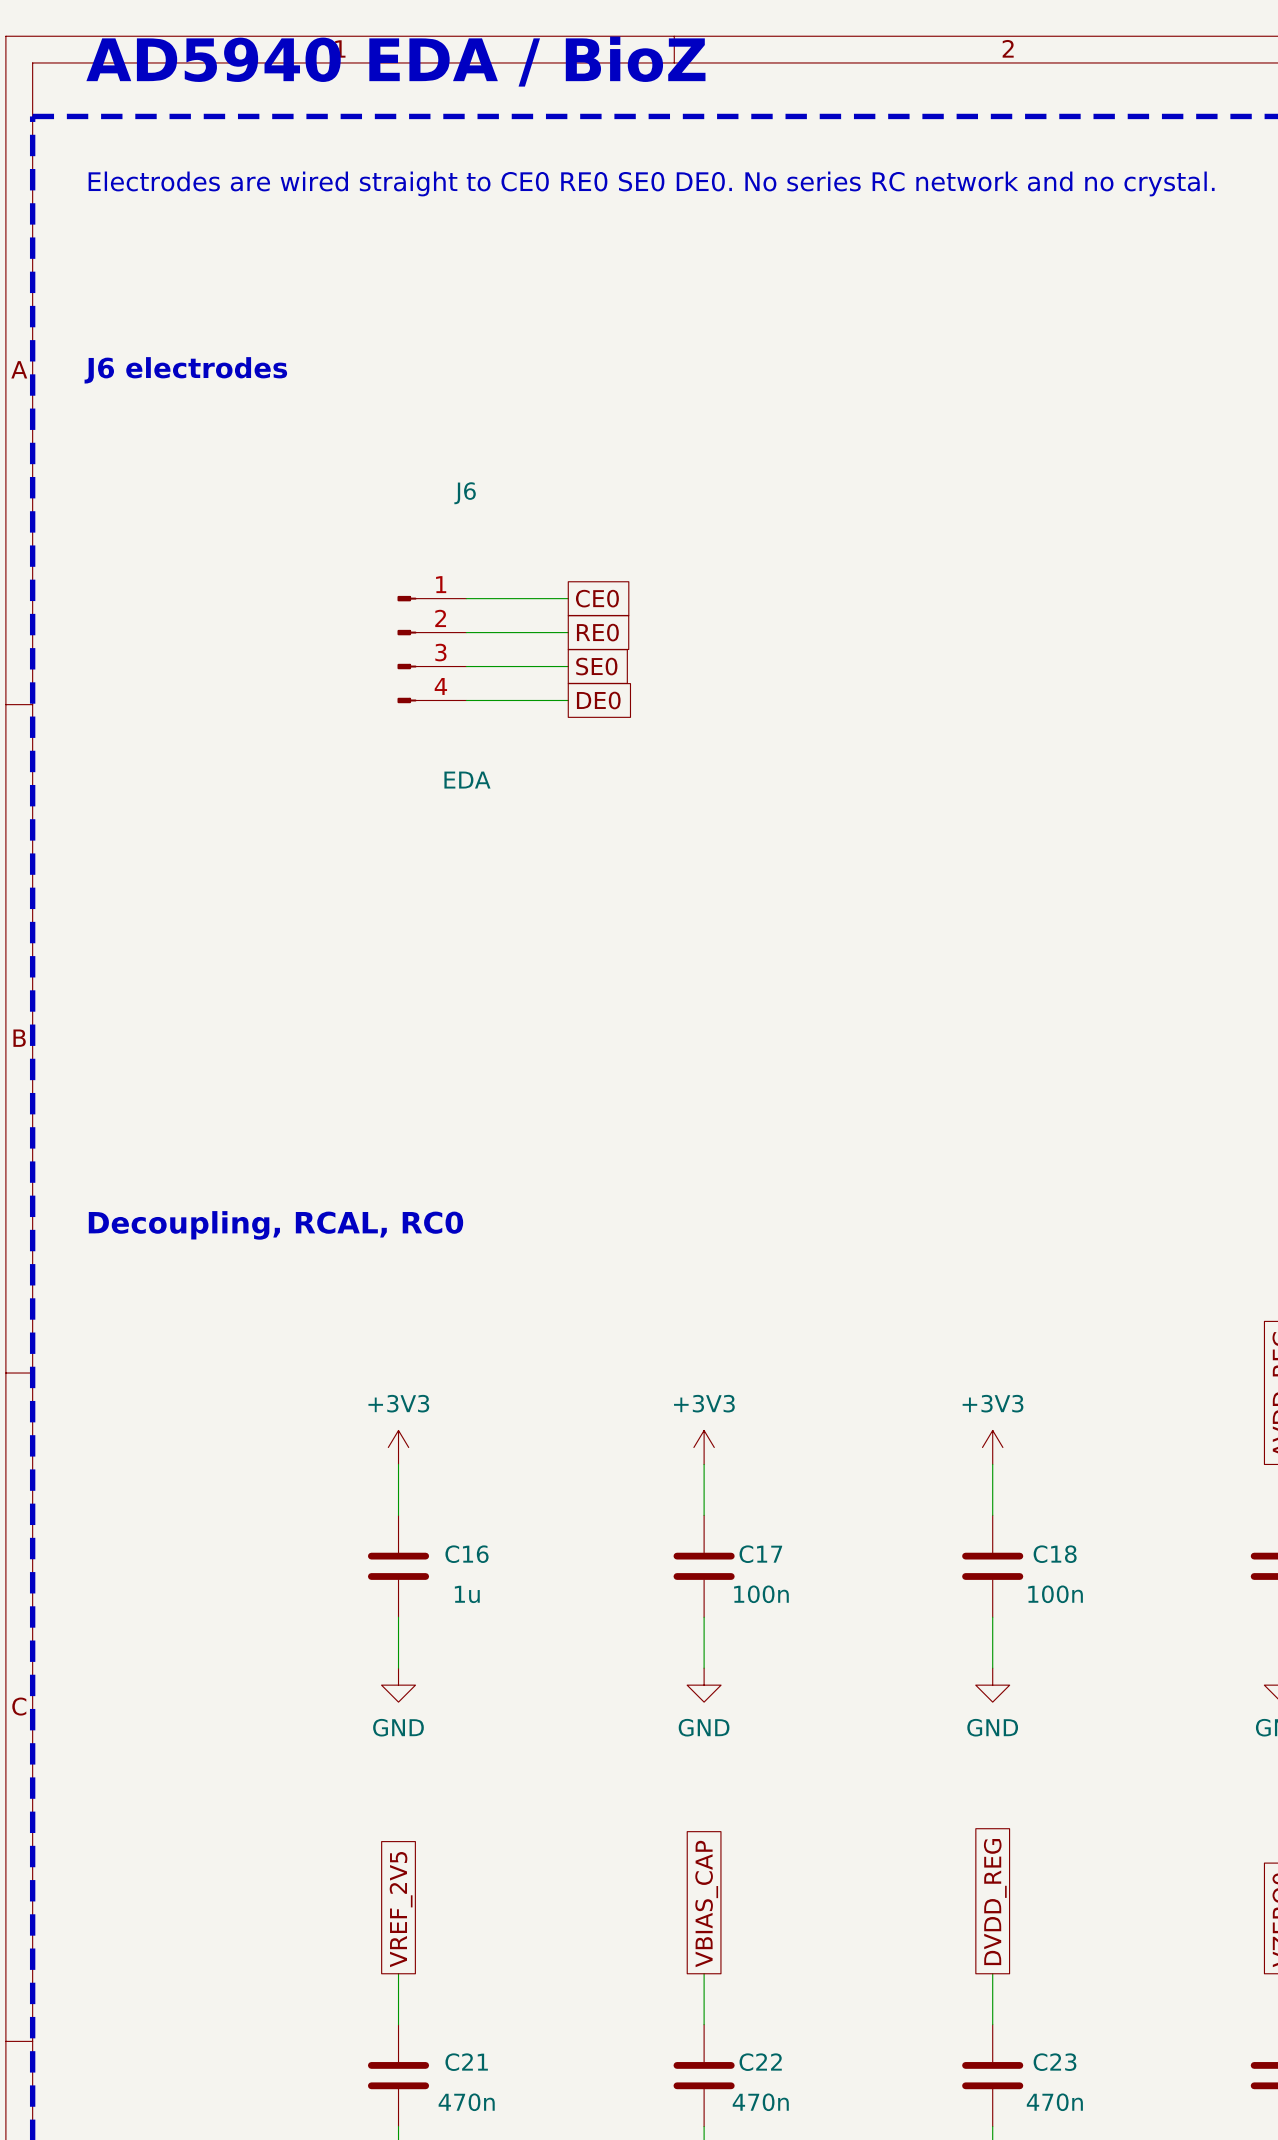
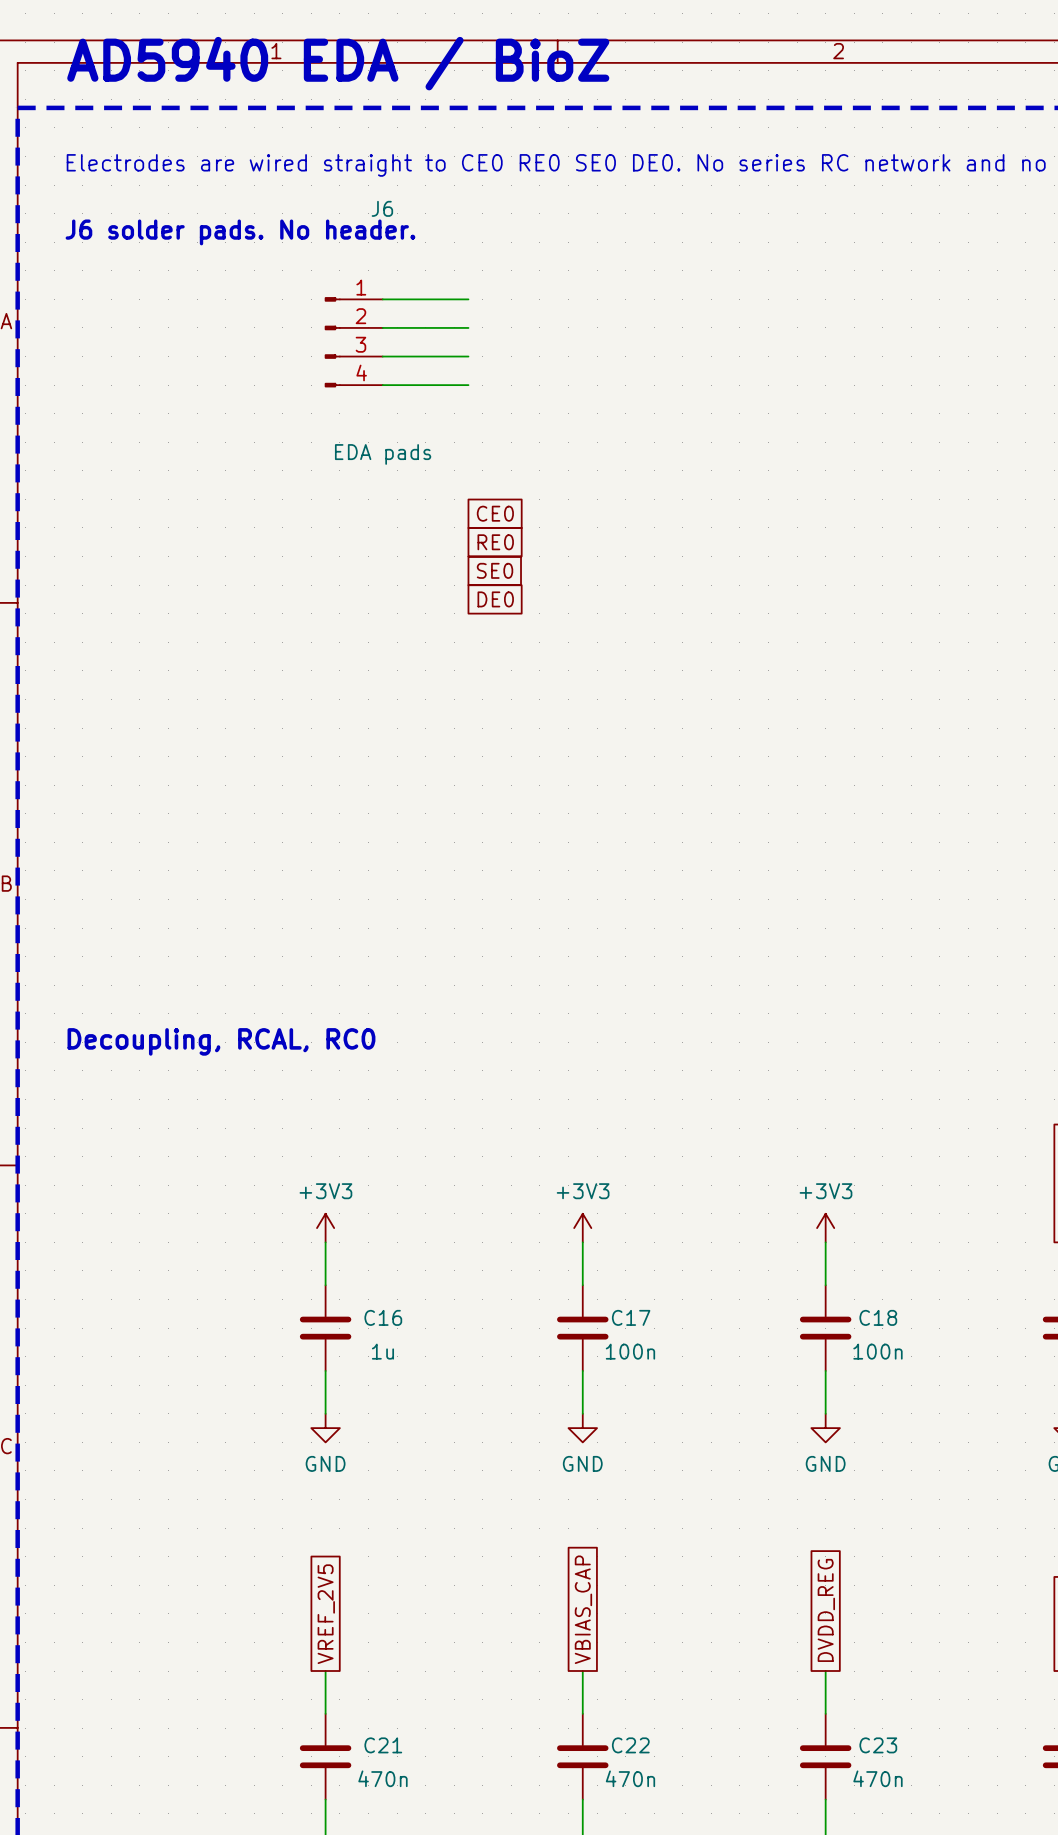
text: none -> J6 solder pads. No header. (240, 232)
text: J6 electrodes (185, 370) -> none
wire: (466, 598) (568, 598) -> (382, 299) (468, 299)
wire: (466, 632) (568, 632) -> (382, 327) (468, 327)
J6 position: (431, 649) -> (353, 342)
wire: (466, 666) (568, 666) -> (382, 356) (468, 356)
wire: (466, 700) (568, 700) -> (382, 385) (468, 385)
J6 value: EDA (467, 780) -> EDA pads (383, 454)

